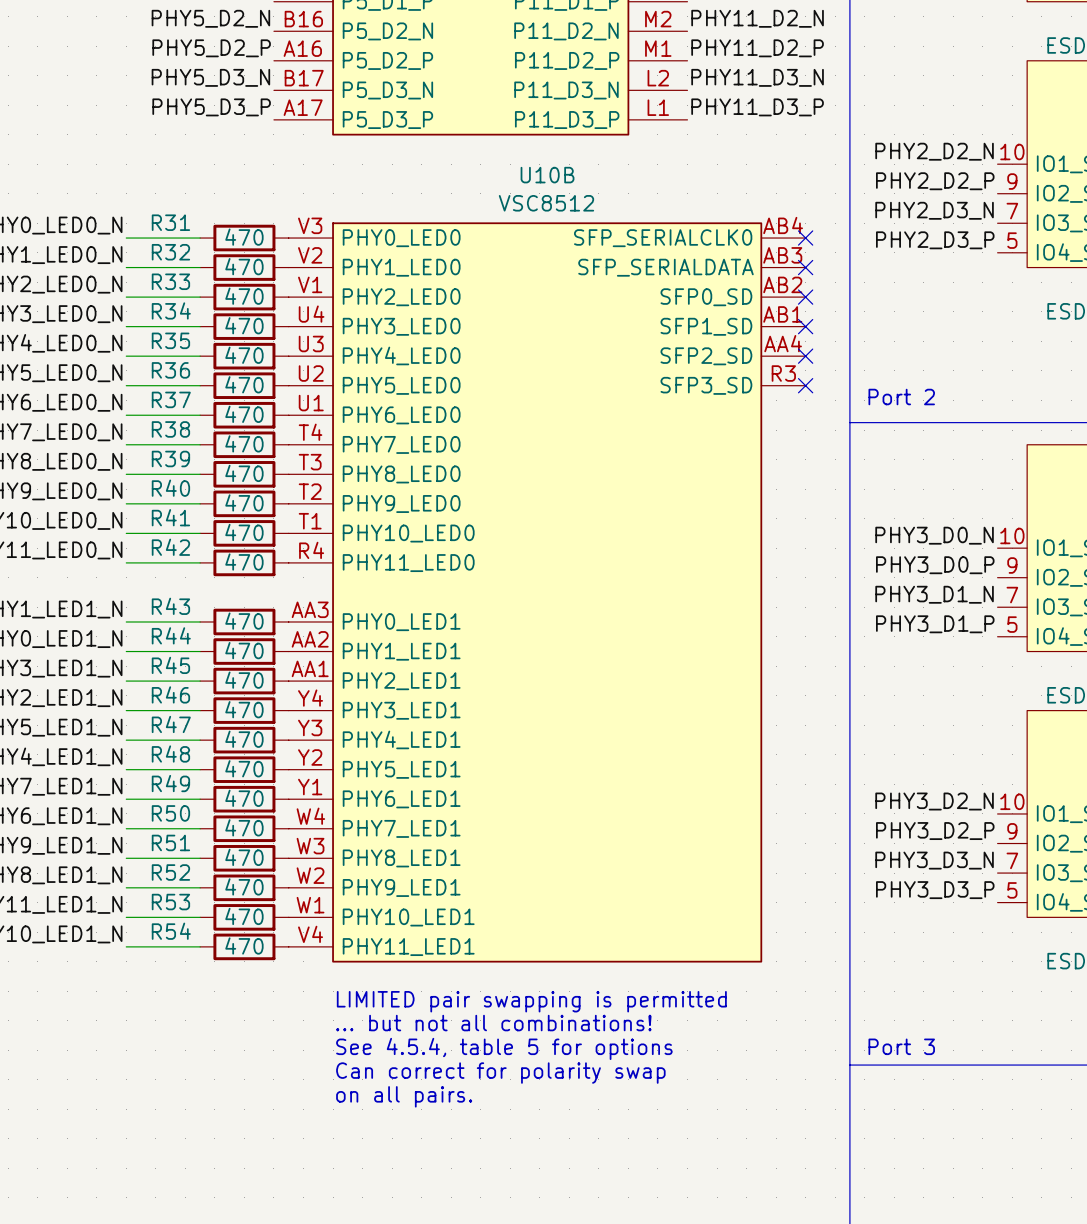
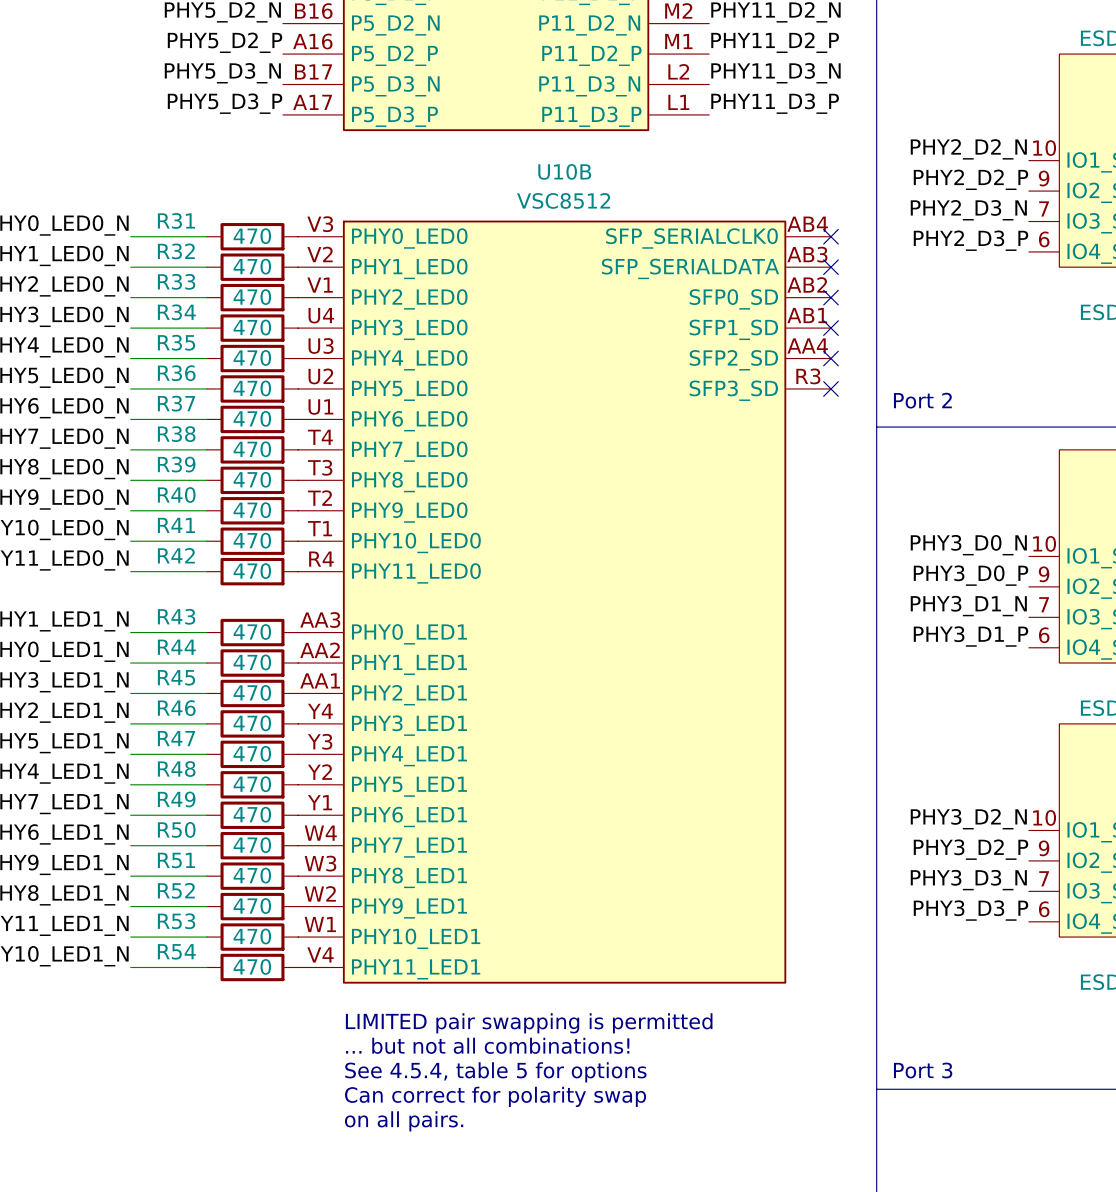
part pin number: 5 (1012, 240) -> 6 (1044, 239)
part pin number: 5 (1012, 624) -> 6 (1044, 635)
part pin number: 5 (1012, 890) -> 6 (1044, 909)

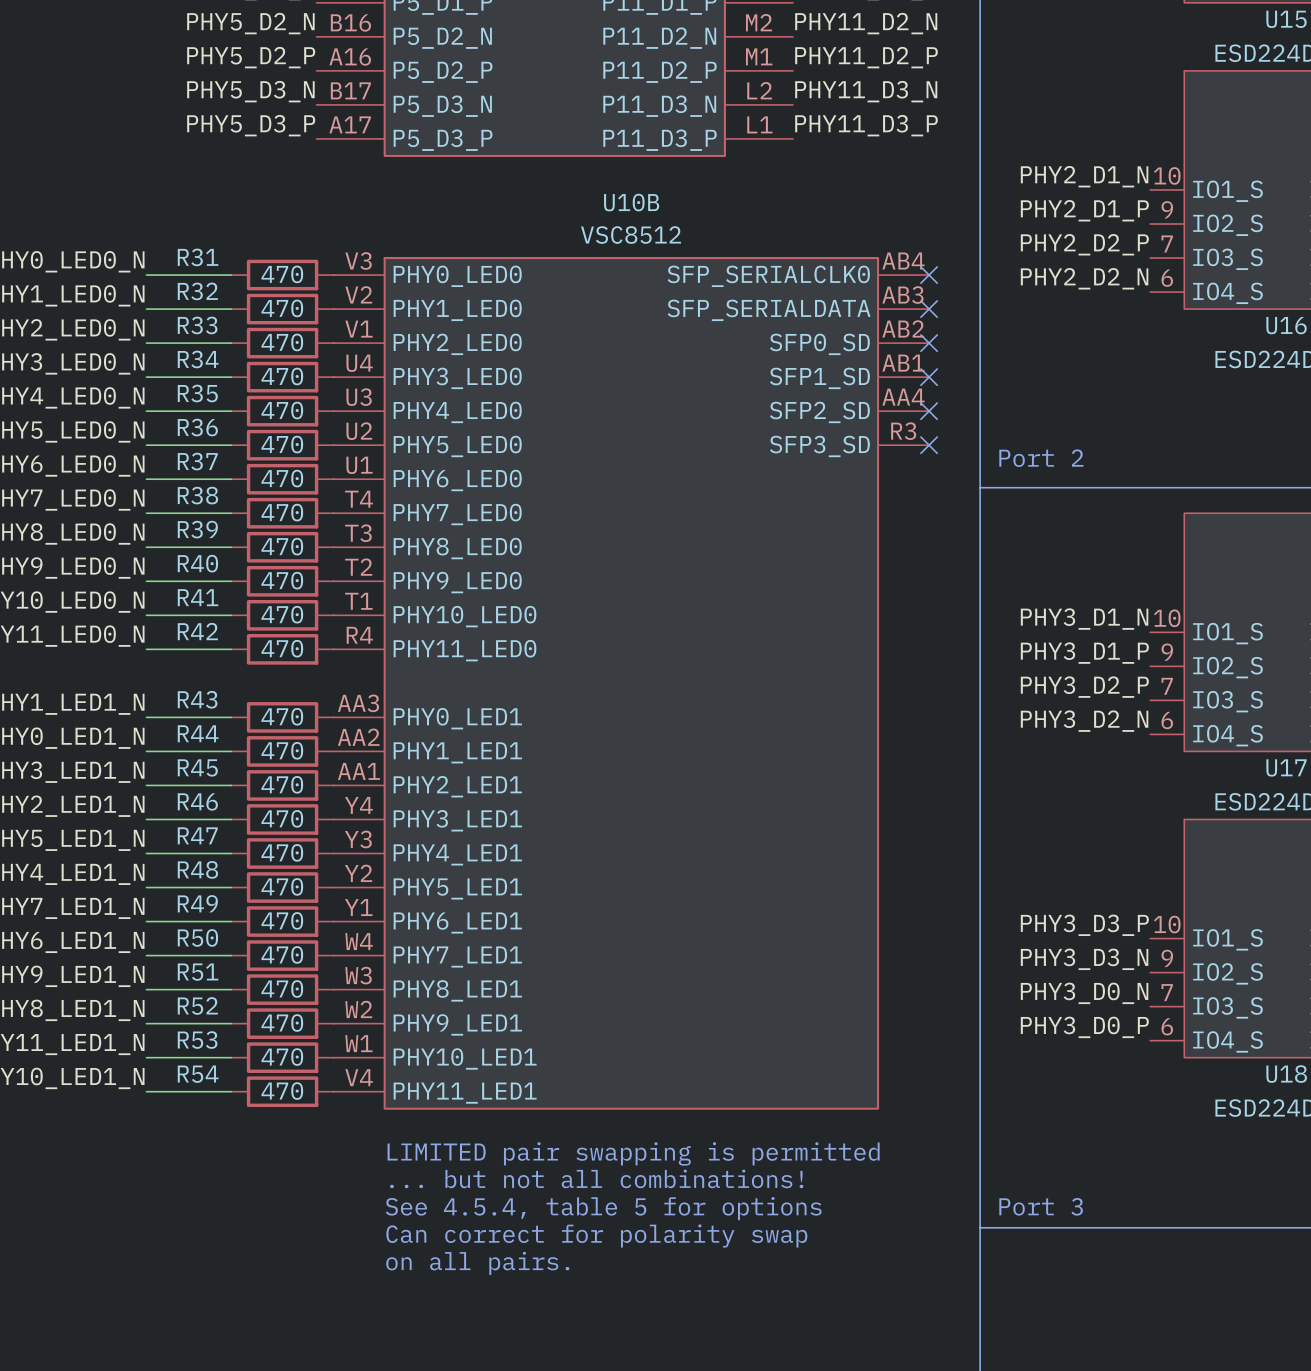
label: PHY2_D2_N (968, 149) -> PHY2_D1_N (1084, 176)
label: PHY2_D2_P (970, 179) -> PHY2_D1_P (1084, 210)
label: PHY2_D3_N (968, 210) -> PHY2_D2_P (1084, 244)
label: PHY2_D3_P (970, 240) -> PHY2_D2_N (1084, 278)
label: PHY3_D0_N (968, 545) -> PHY3_D1_N (1084, 619)
label: PHY3_D0_P (970, 575) -> PHY3_D1_P (1084, 653)
label: PHY3_D1_N (968, 606) -> PHY3_D2_P (1084, 687)
label: PHY3_D1_P (970, 636) -> PHY3_D2_N (1084, 721)
label: PHY3_D2_N (968, 819) -> PHY3_D3_P (1084, 925)
label: PHY3_D2_P (970, 849) -> PHY3_D3_N (1084, 959)
label: PHY3_D3_N (968, 880) -> PHY3_D0_N (1084, 993)
label: PHY3_D3_P (970, 910) -> PHY3_D0_P (1084, 1027)

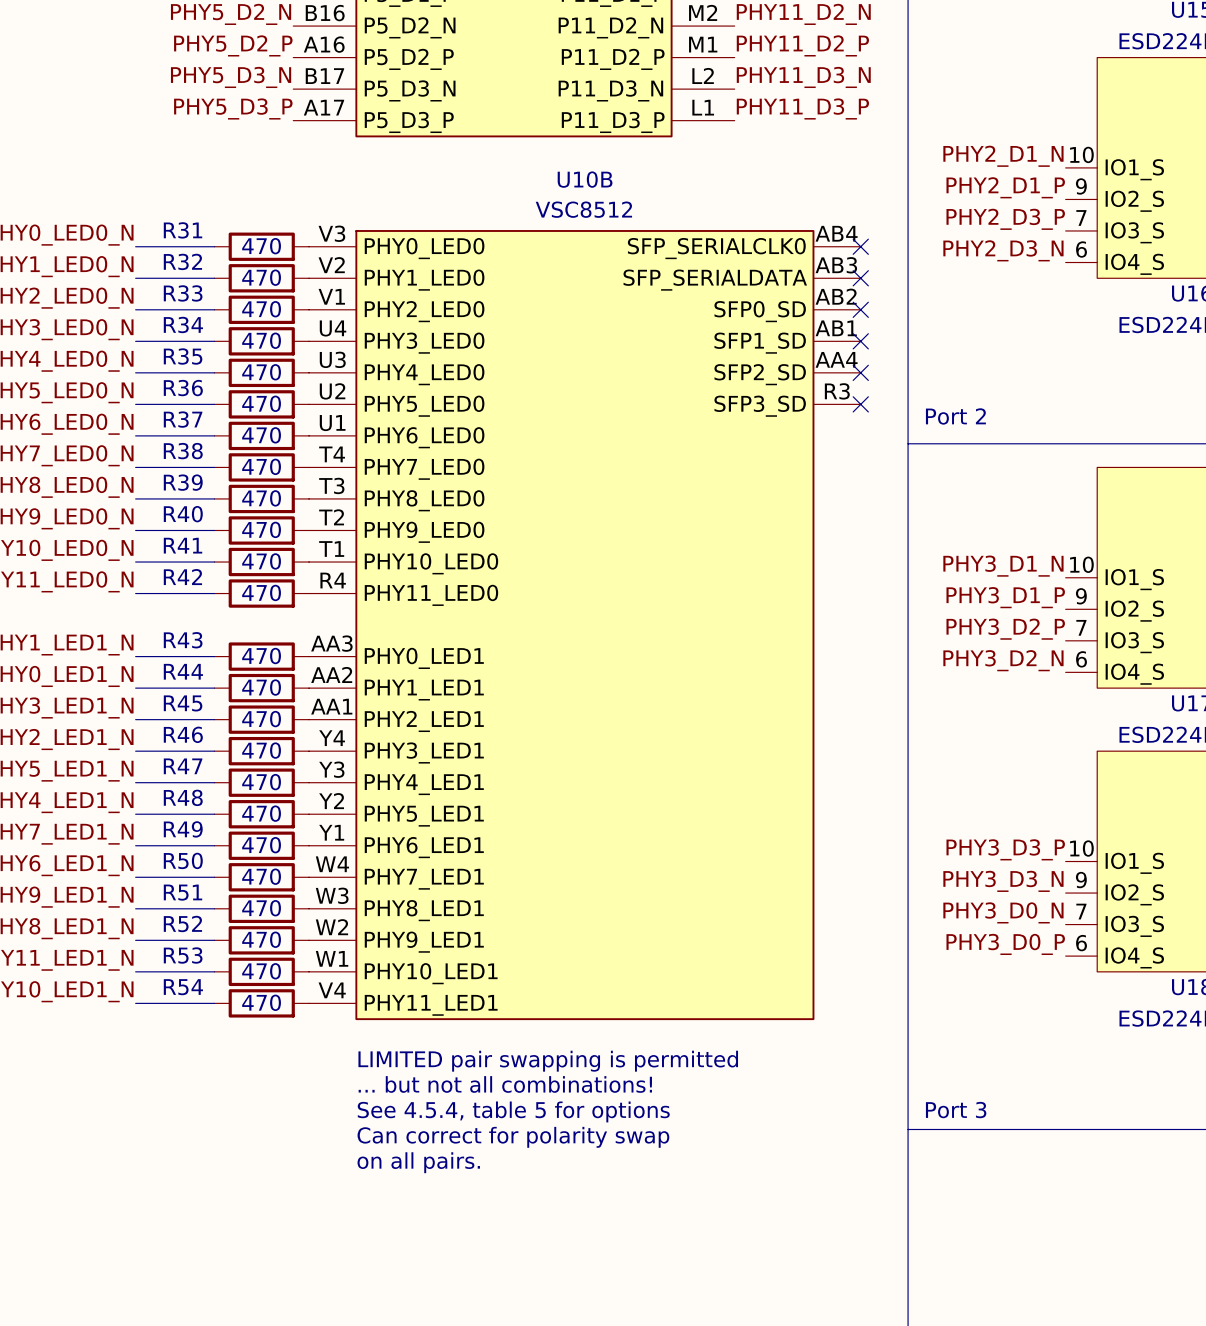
label: PHY2_D2_P (1084, 244) -> PHY2_D3_P (1005, 219)
label: PHY2_D2_N (1084, 278) -> PHY2_D3_N (1003, 250)

